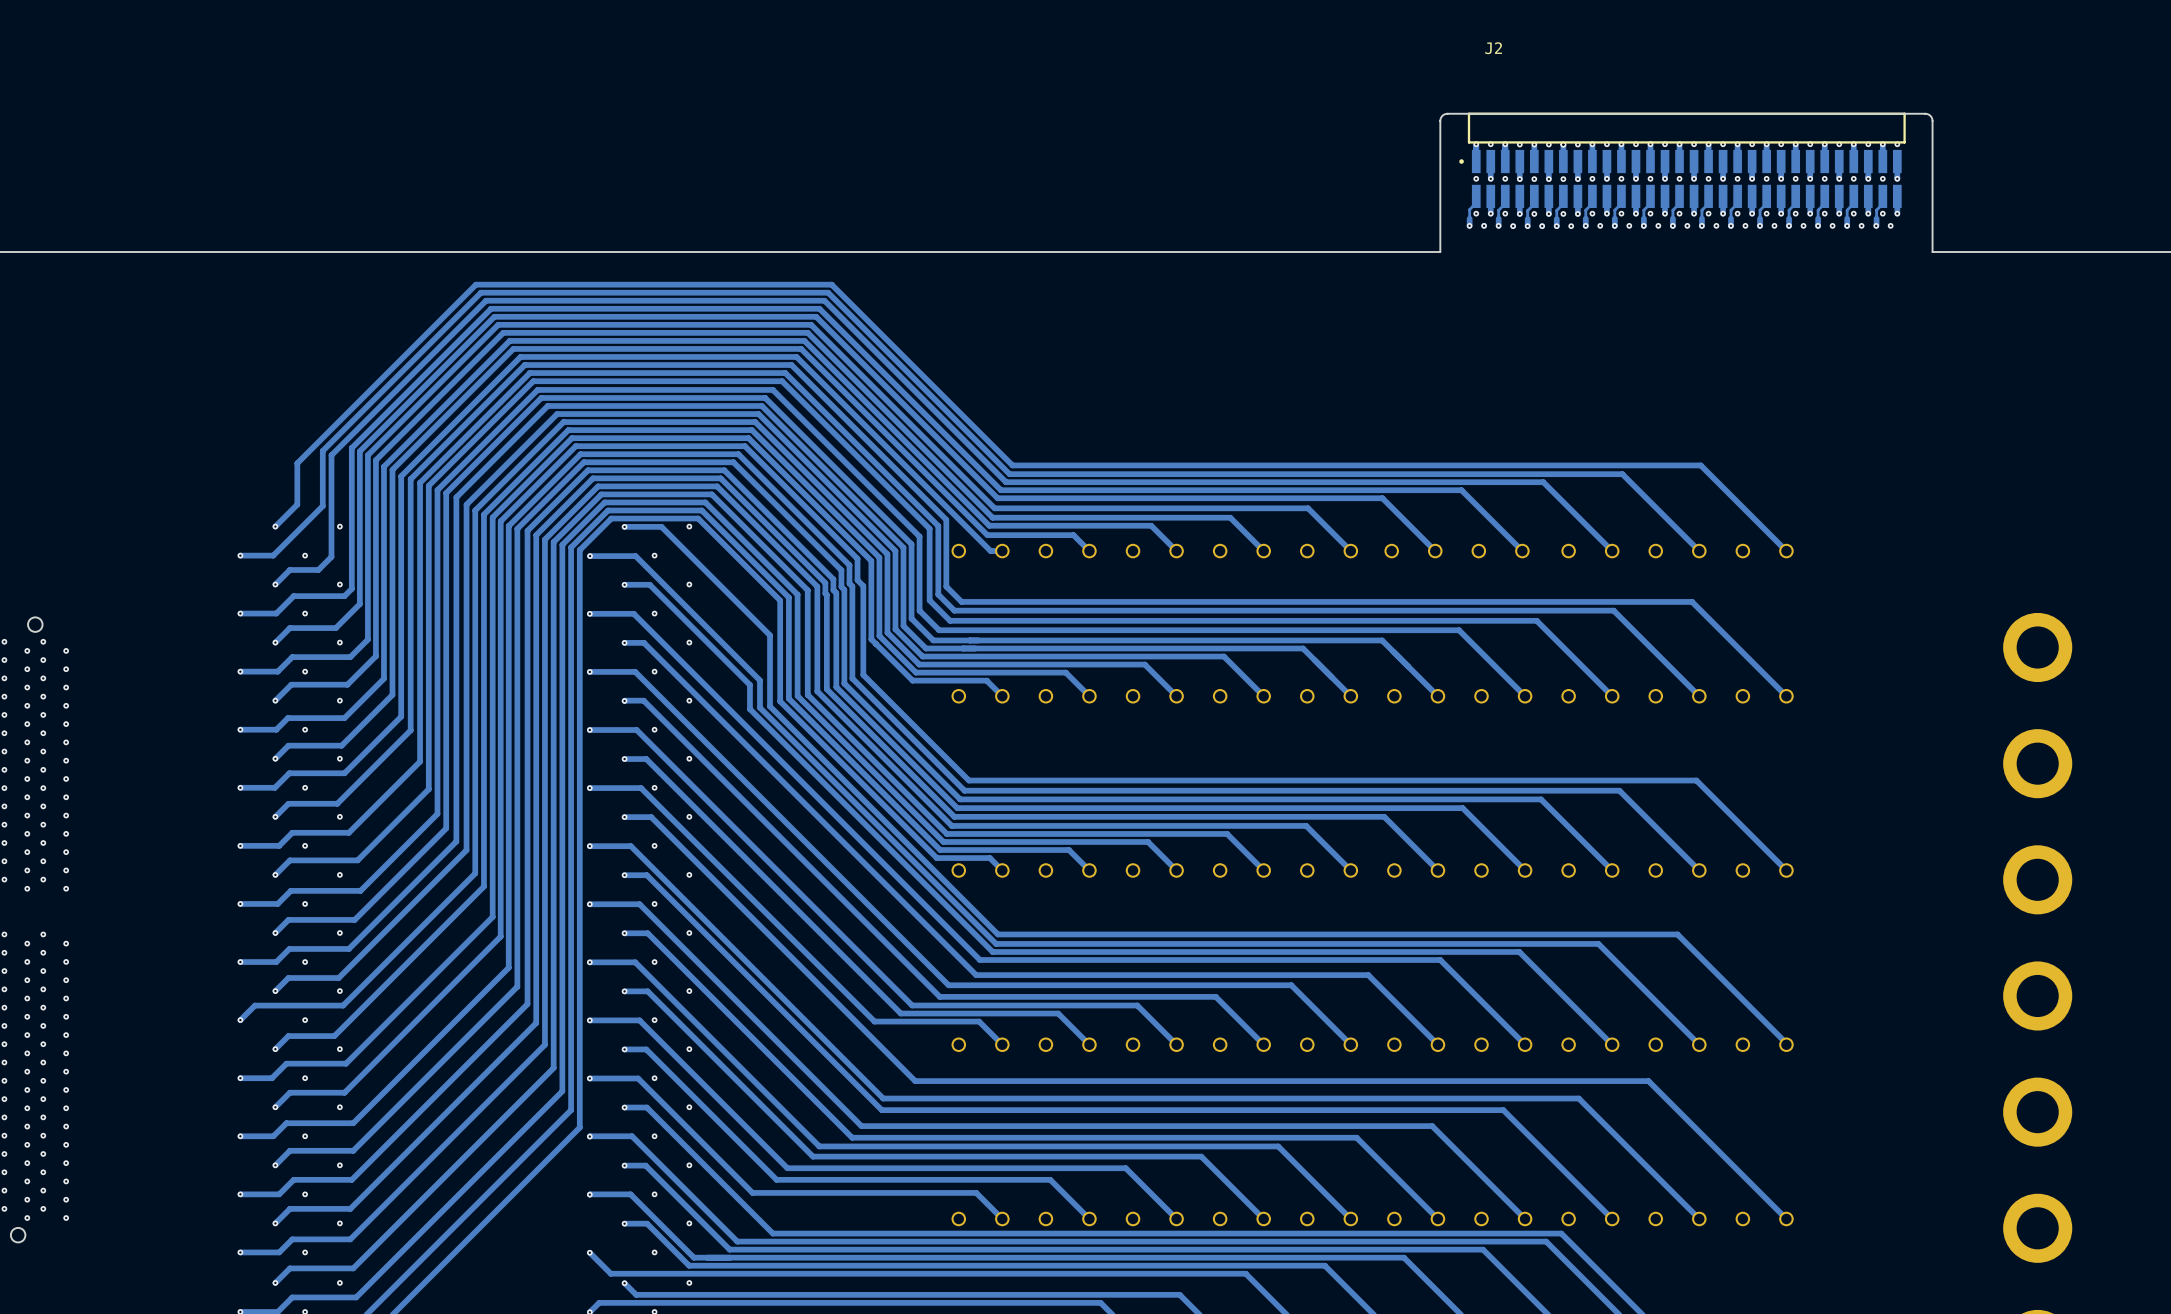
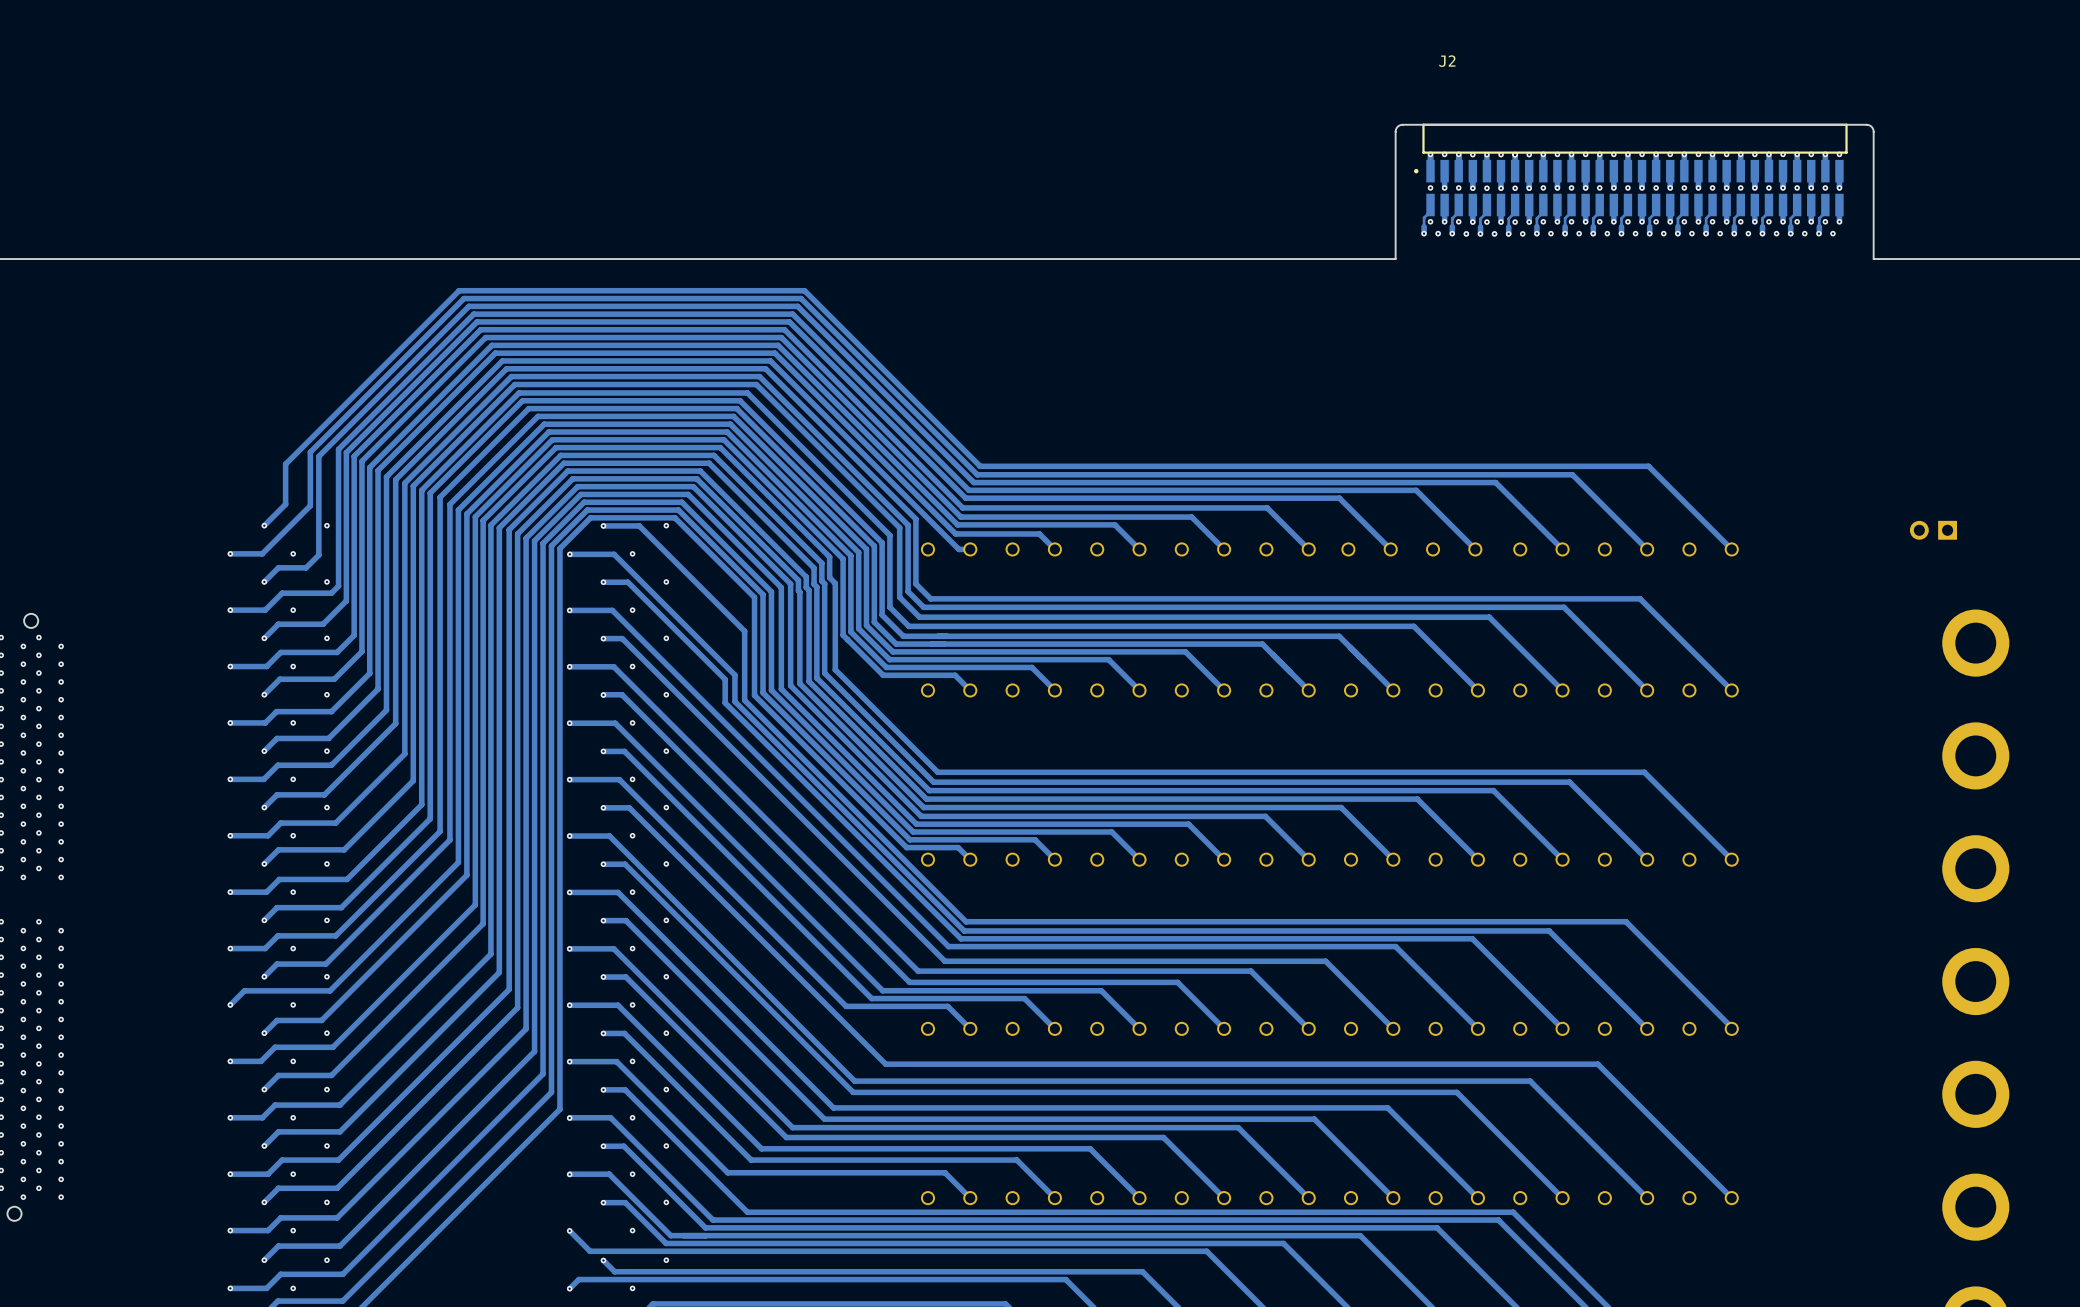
part: none -> (1933, 530)

